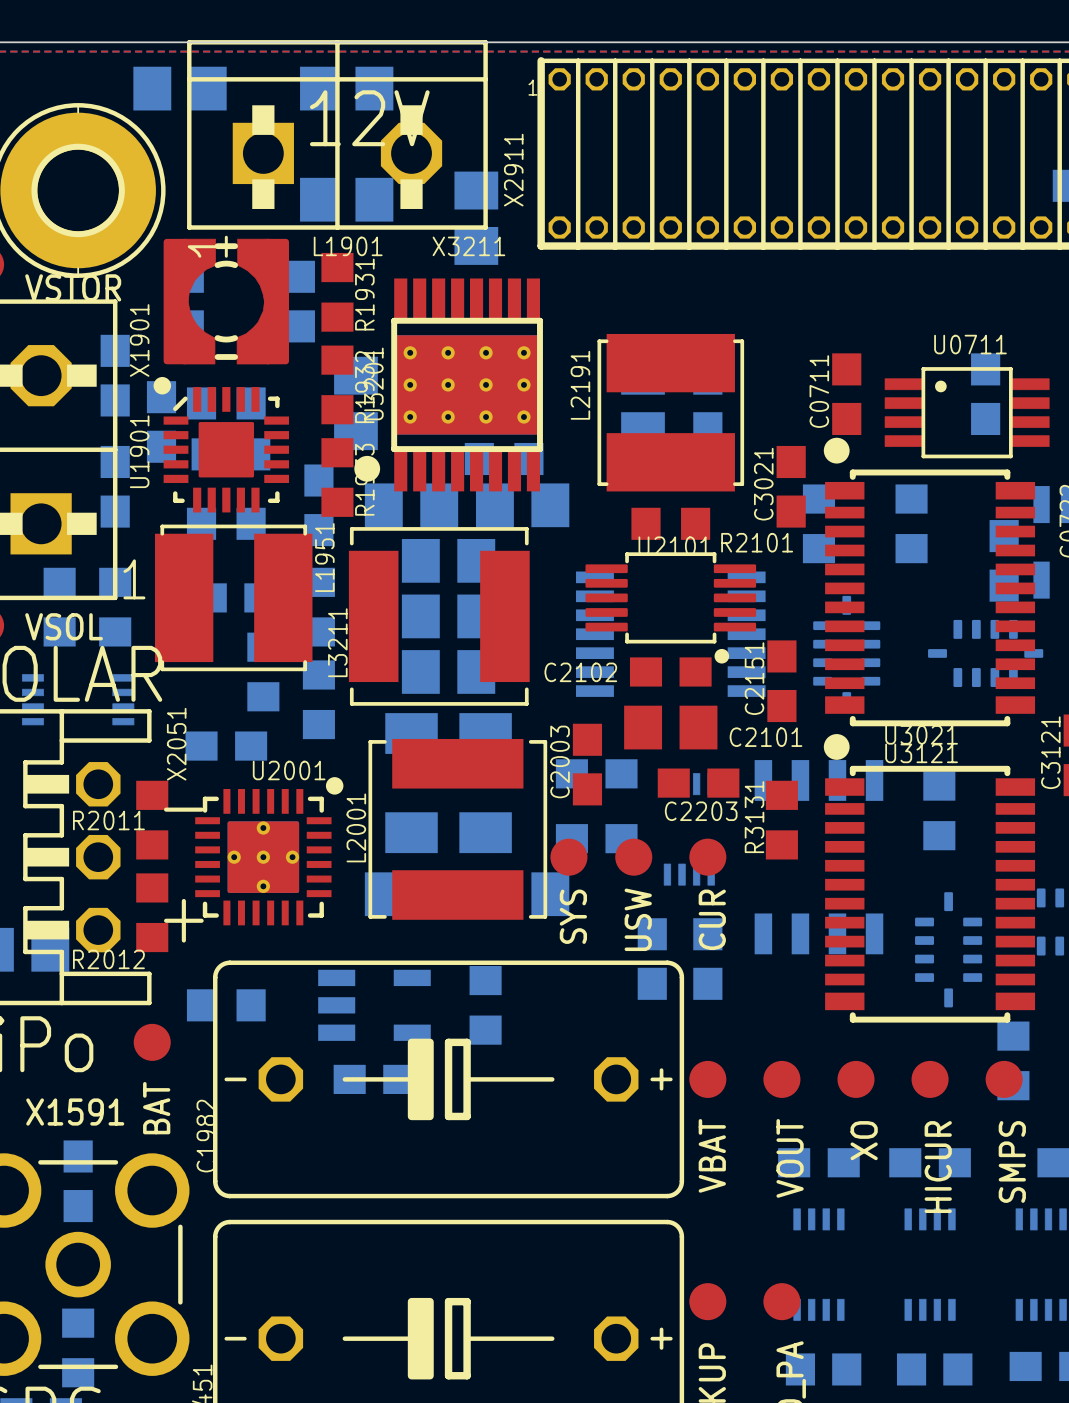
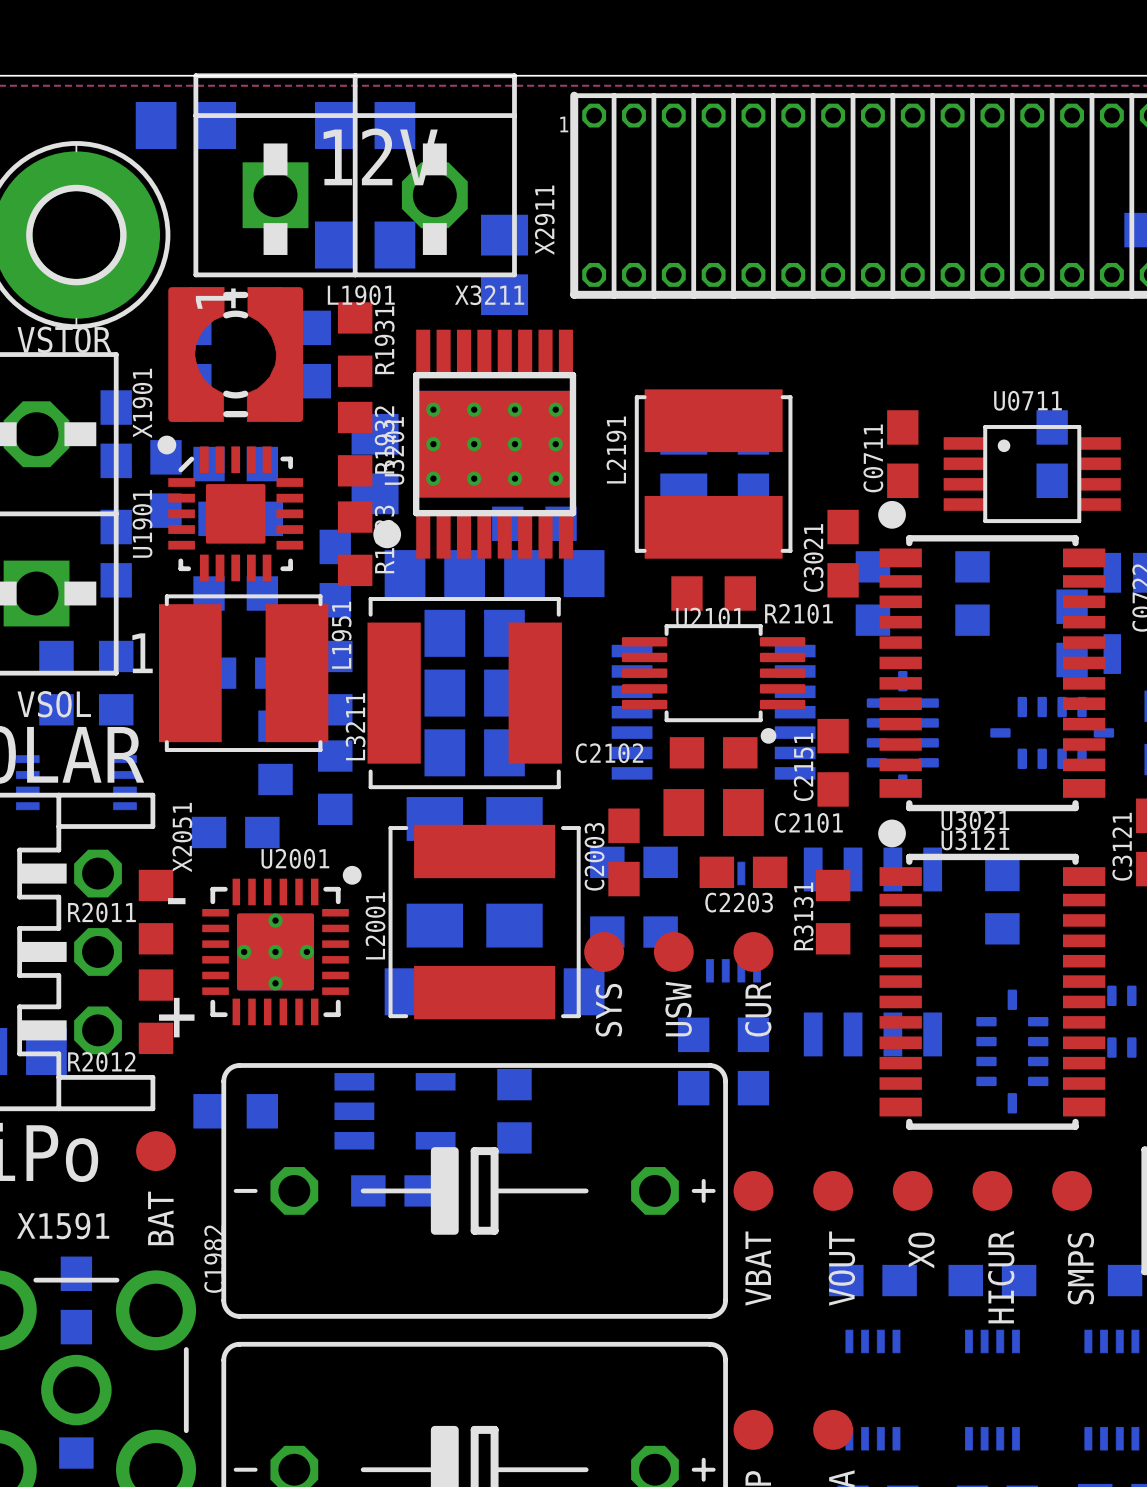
part: (1013, 1060) -> none

